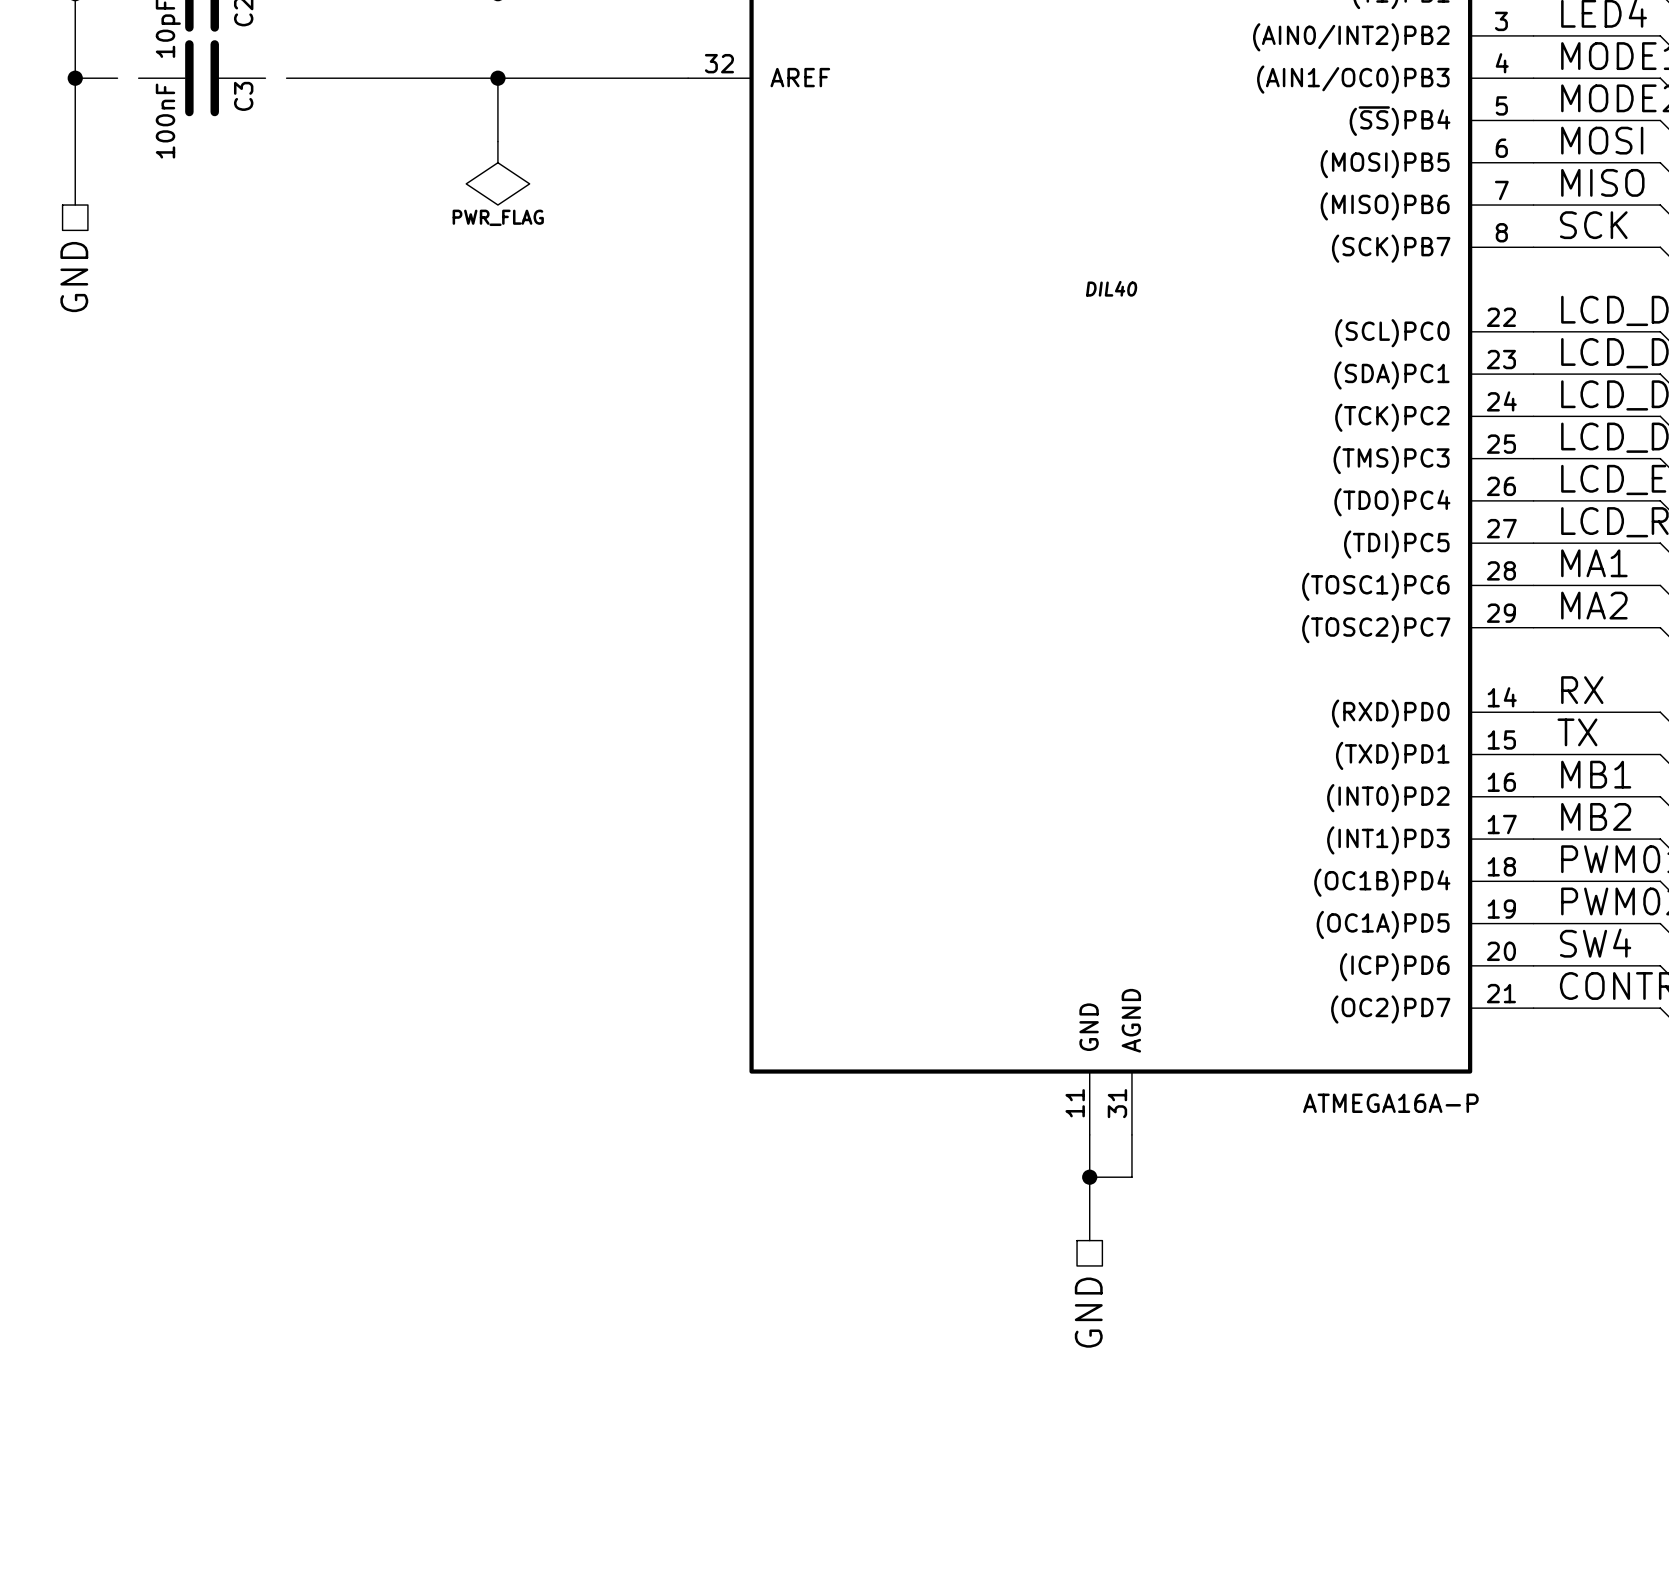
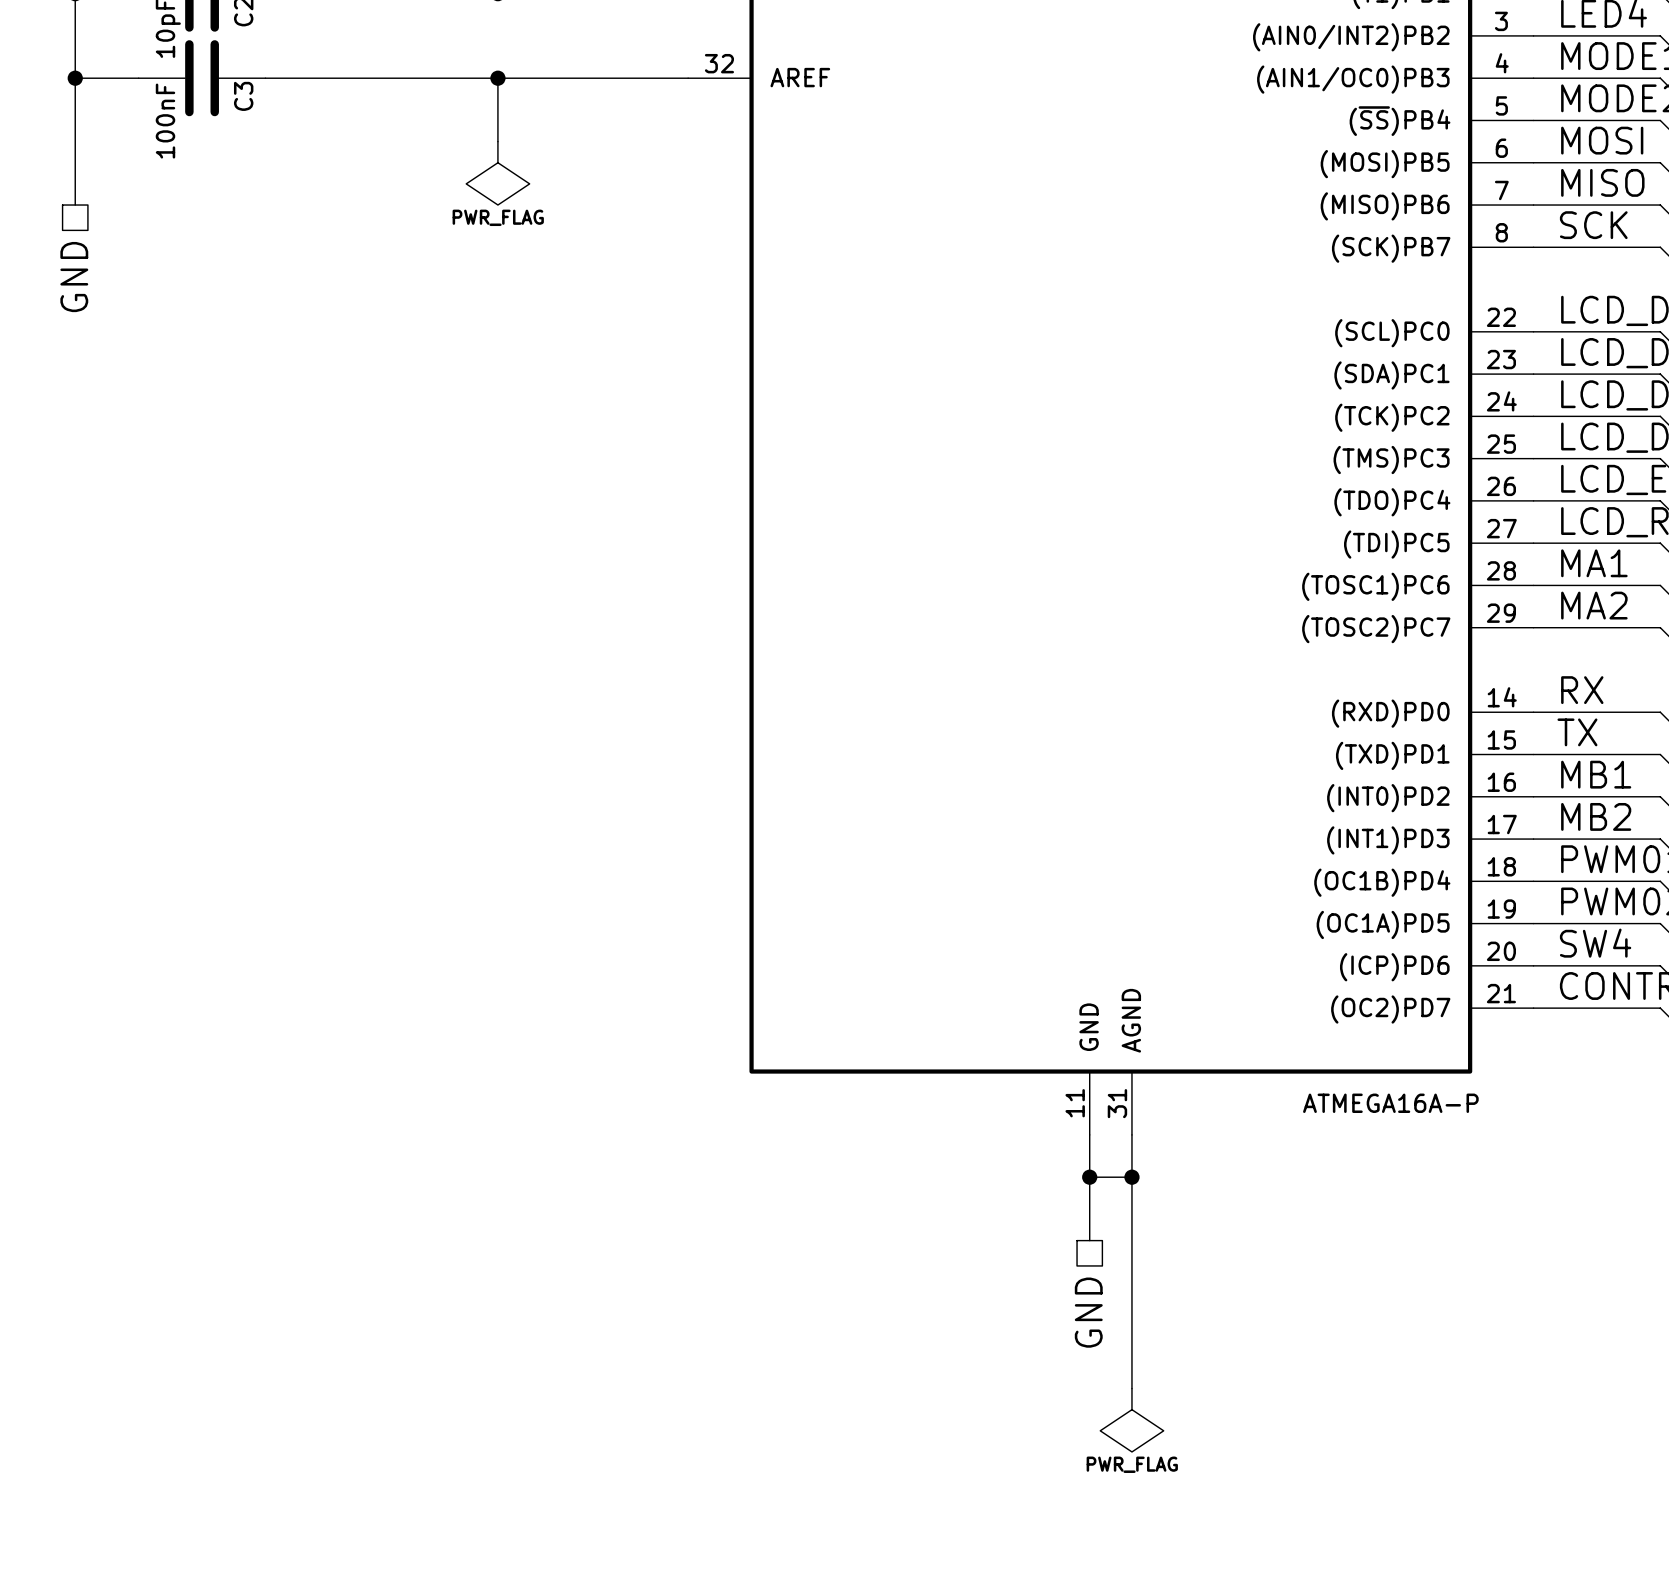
wire: none -> (117, 78) (138, 78)
wire: none -> (265, 78) (286, 78)
part text: DIL40 (1111, 288) -> none
wire: none -> (1131, 1177) (1131, 1388)
junction: none -> (1131, 1177)
power symbol: none -> PWR_FLAG (1131, 1420)

